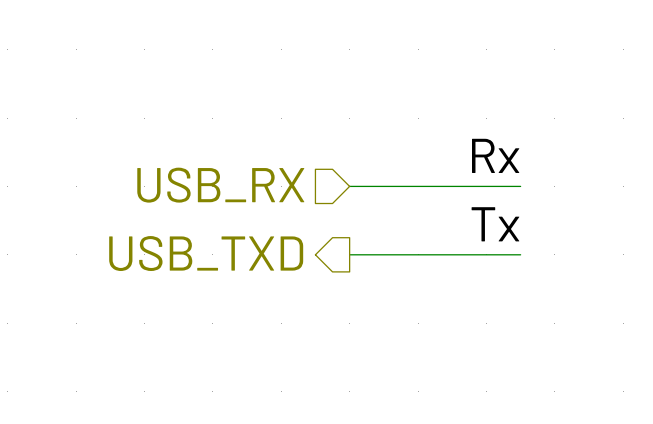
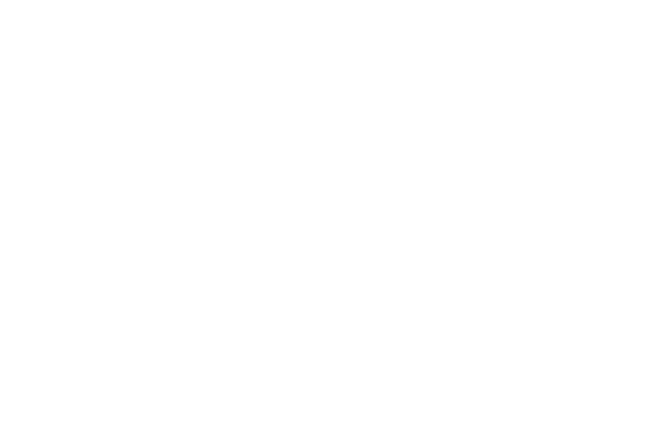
label: Rx (495, 155) -> none
hierarchical label: USB_RX (220, 185) -> none
wire: (349, 186) (520, 186) -> none
label: Tx (495, 224) -> none
hierarchical label: USB_TXD (206, 253) -> none
wire: (349, 254) (520, 254) -> none

